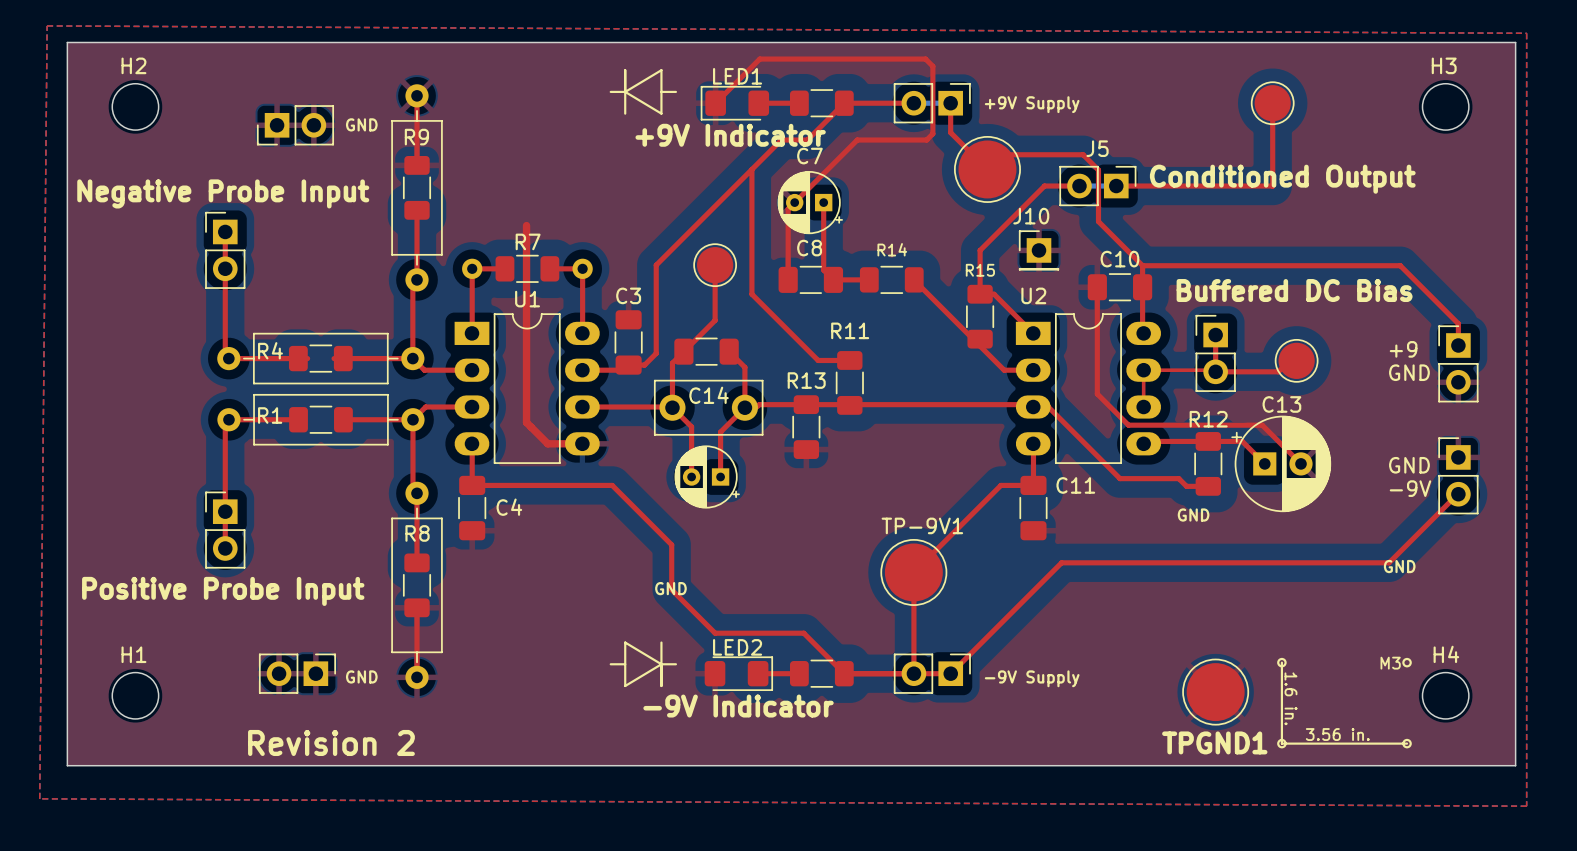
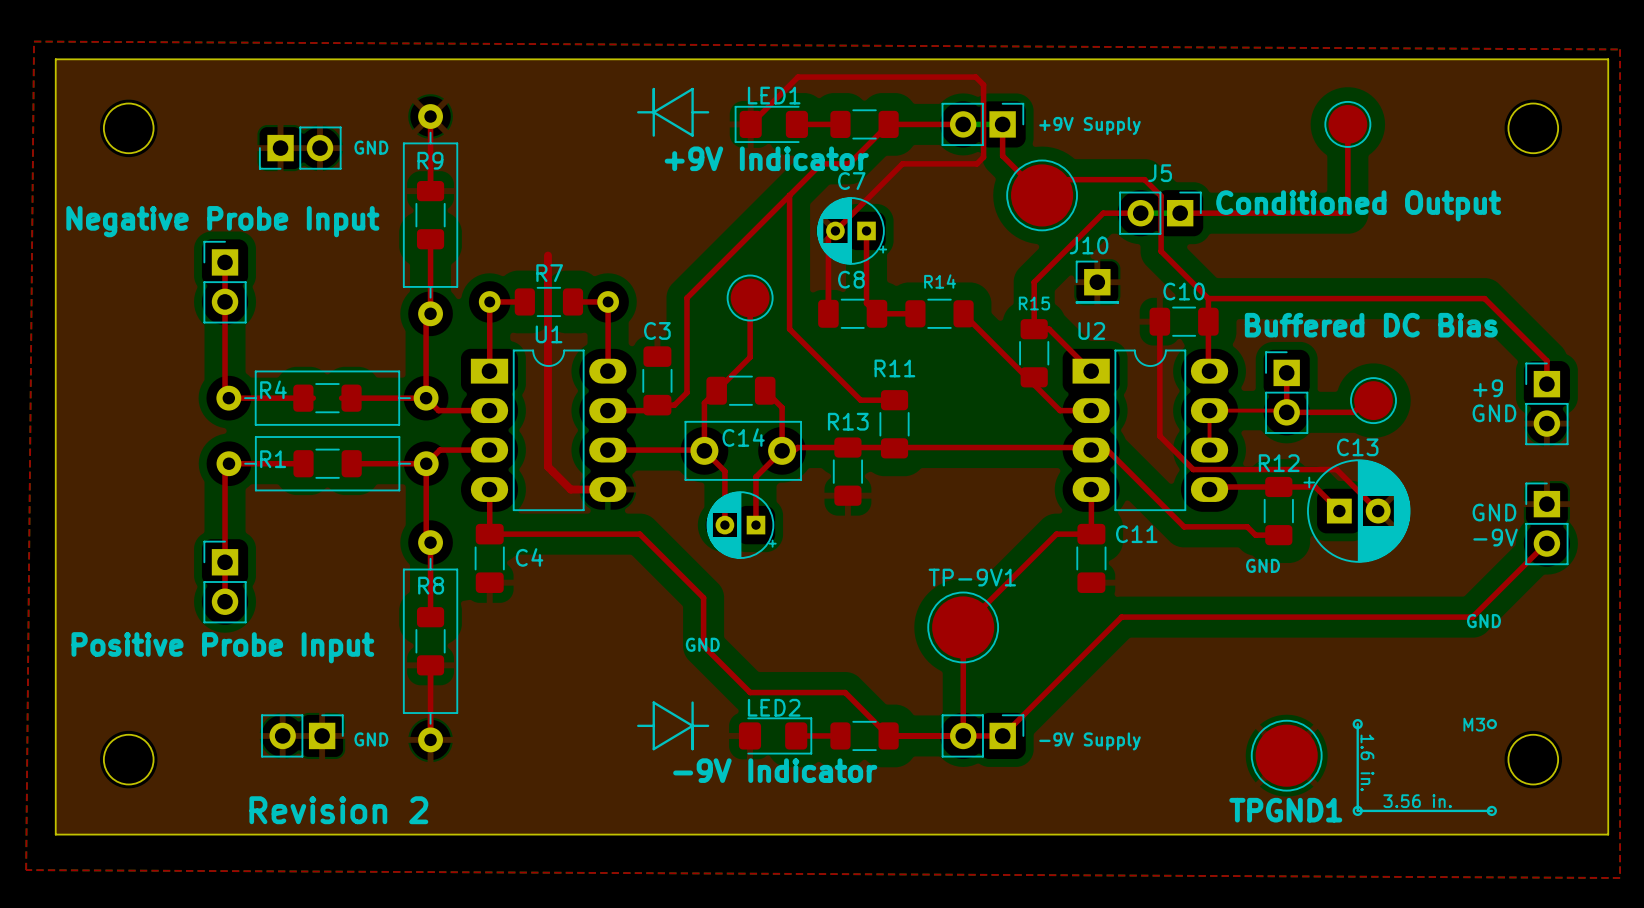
H2 name: H2 (133, 65) -> none
H3 name: H3 (1444, 65) -> none
H1 name: H1 (133, 654) -> none
H4 name: H4 (1446, 654) -> none

